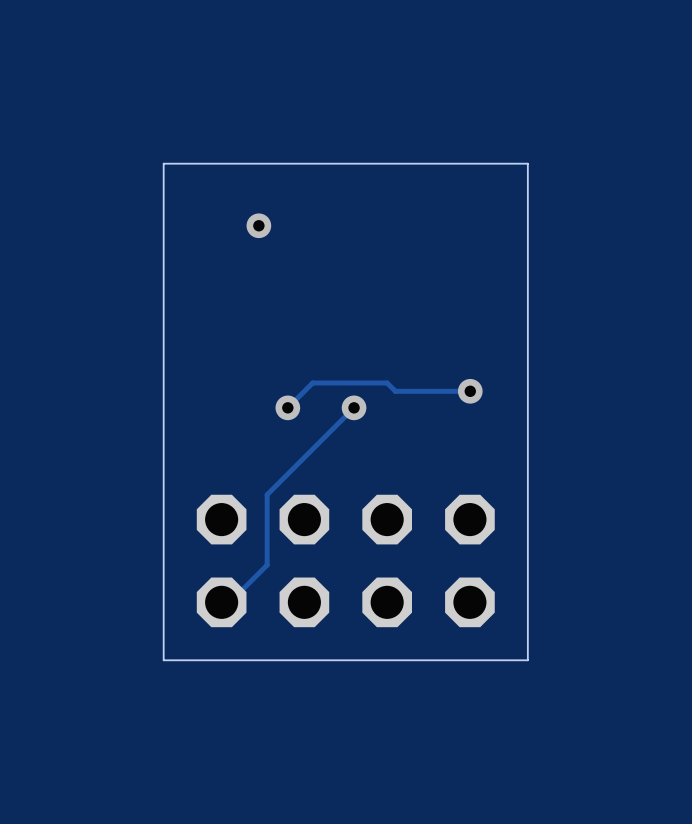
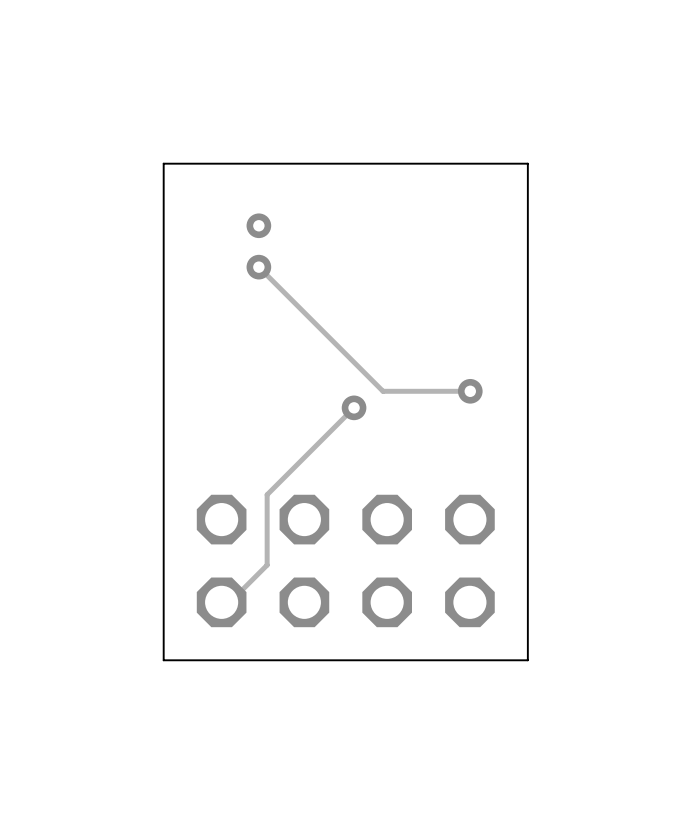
track: (395, 391) (387, 383) (312, 383) (287, 407) -> (395, 391) (383, 391) (258, 267)
via position: (287, 407) -> (258, 267)

